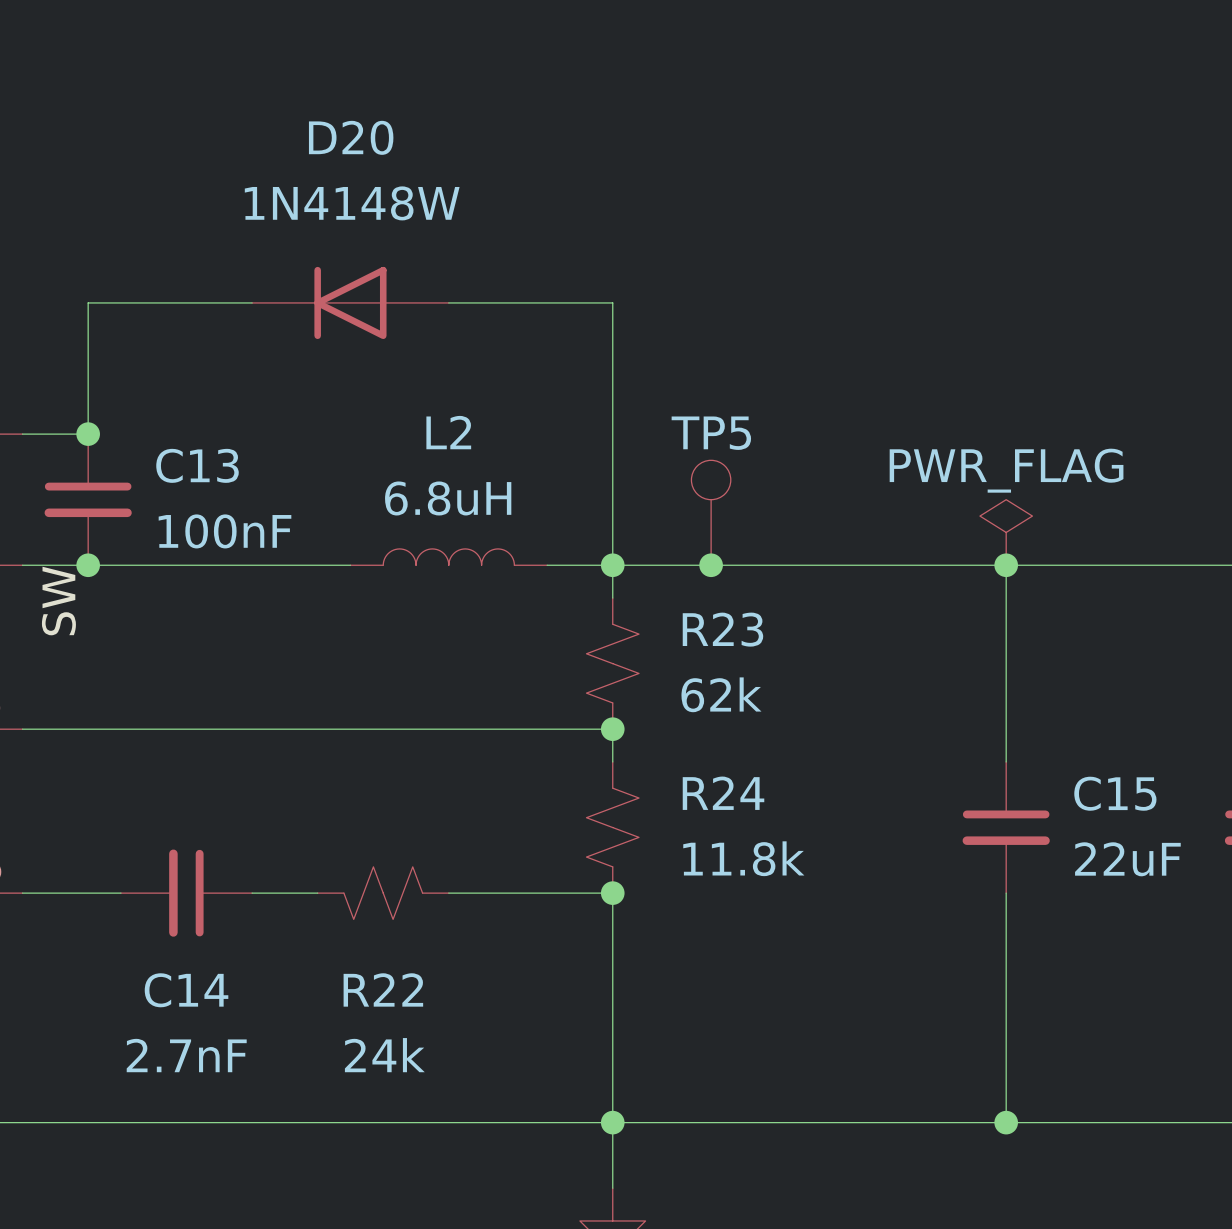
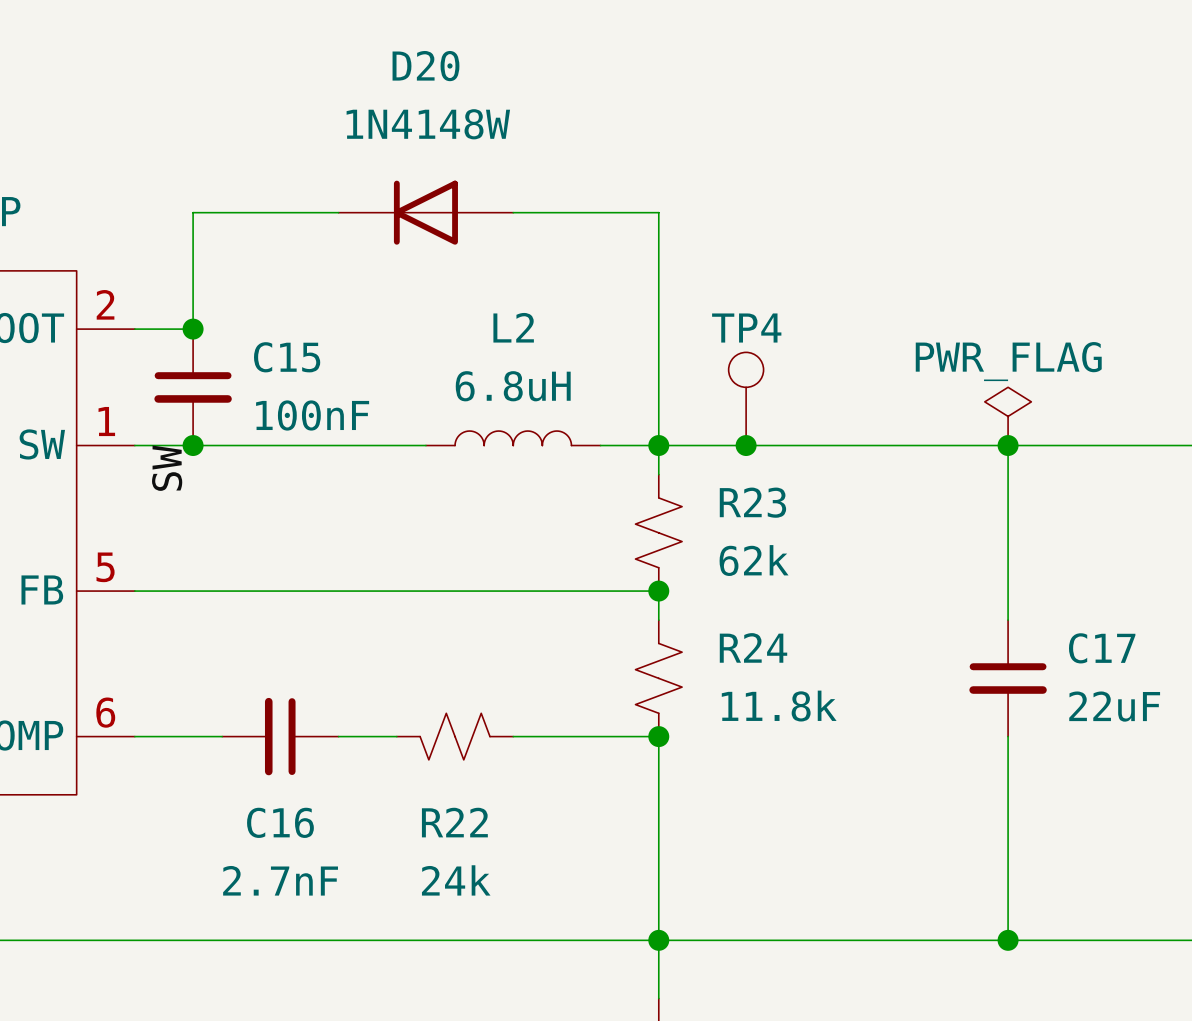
TP5 name: TP5 (711, 433) -> TP4 (746, 328)
C13 name: C13 (197, 465) -> C15 (287, 357)
C15 name: C15 (1115, 793) -> C17 (1102, 648)
C14 name: C14 (186, 990) -> C16 (280, 822)

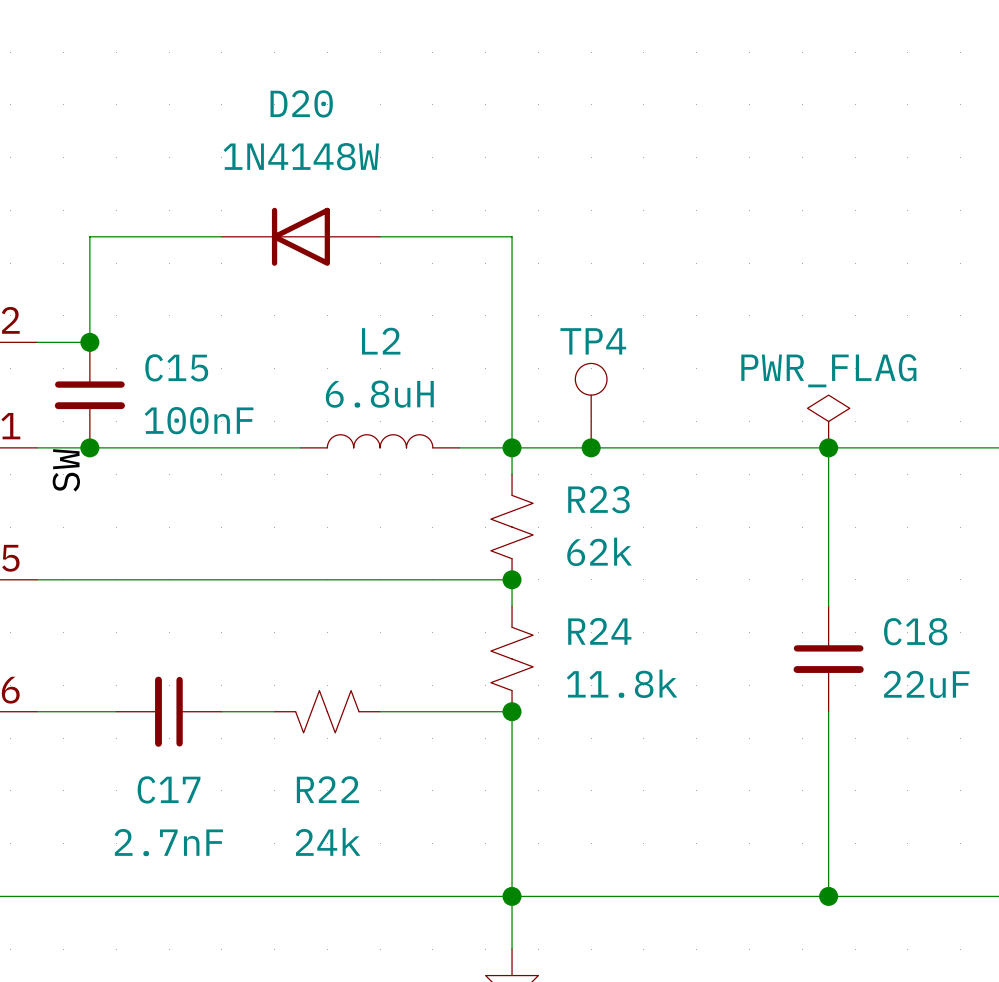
C17 name: C17 (1102, 648) -> C18 (915, 631)
C16 name: C16 (280, 822) -> C17 (169, 789)

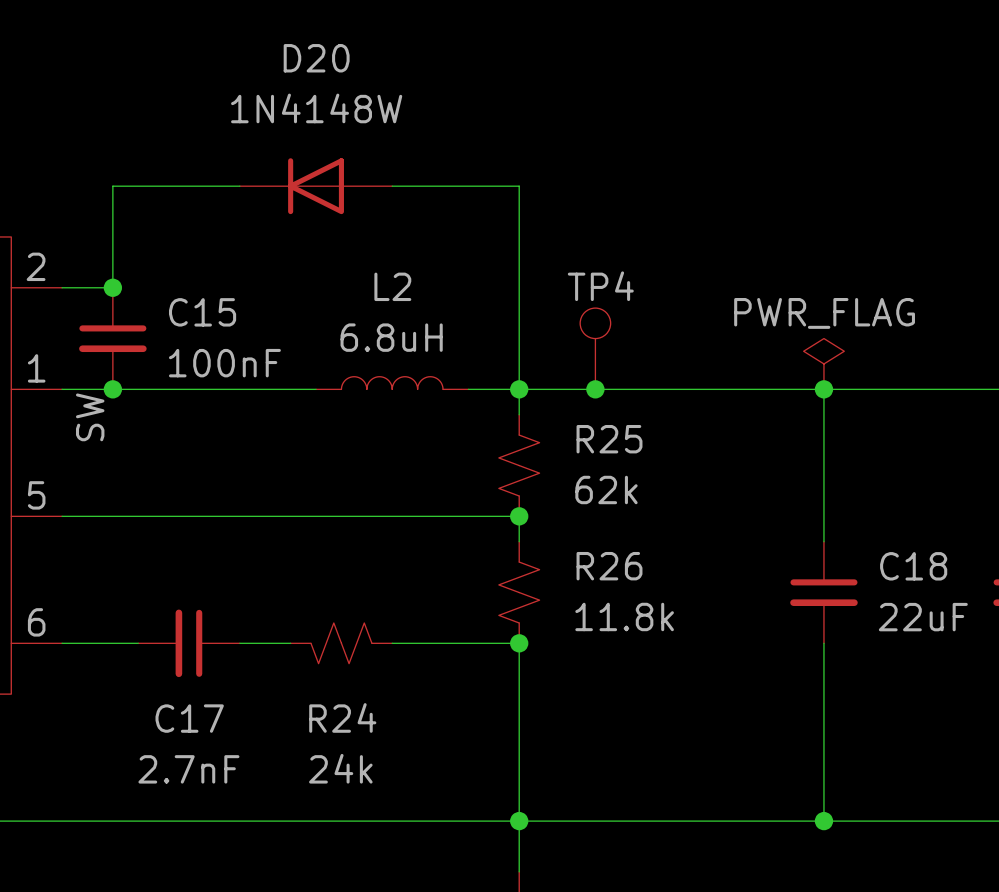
R23 name: R23 (598, 499) -> R25 (609, 439)
R24 name: R24 (599, 631) -> R26 (609, 566)
R22 name: R22 (327, 789) -> R24 (342, 717)

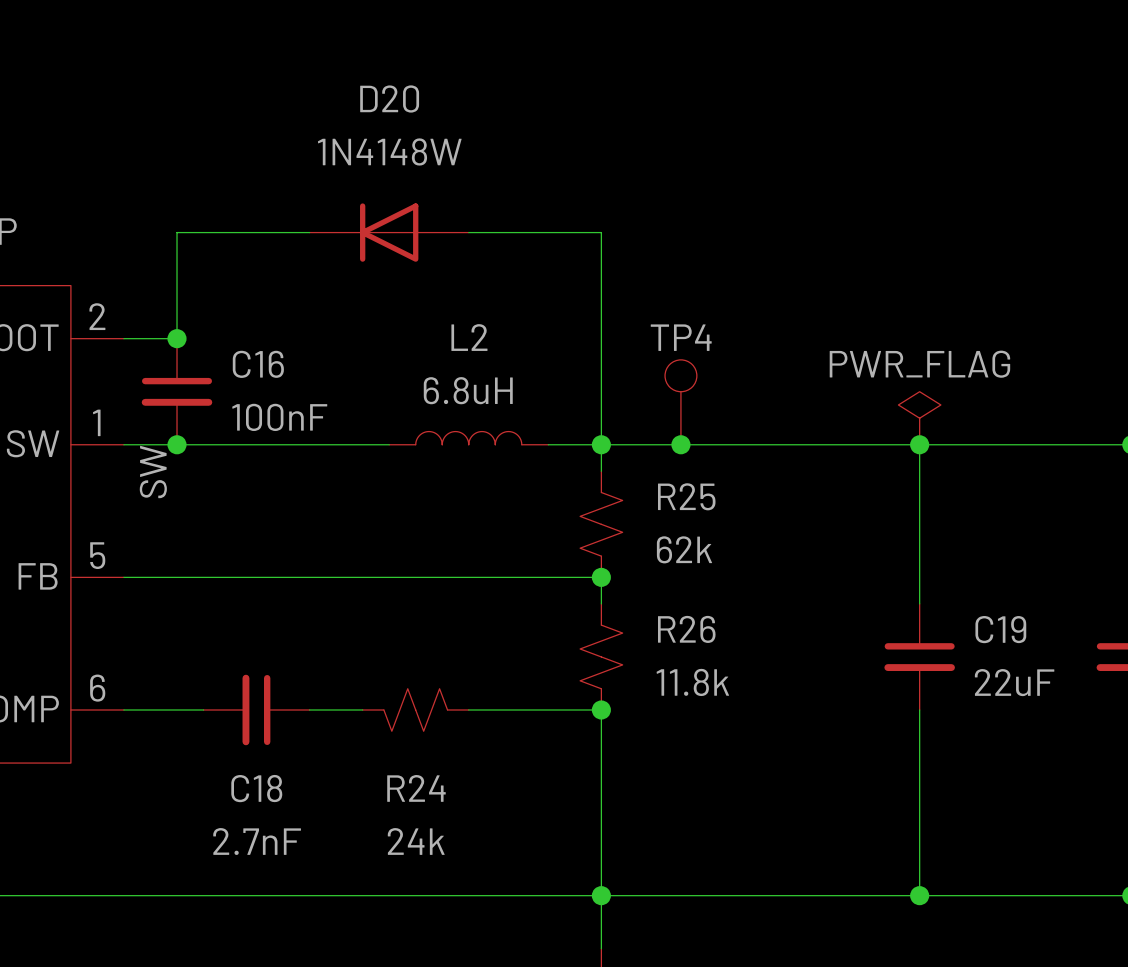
C15 name: C15 (202, 312) -> C16 (258, 364)
C18 name: C18 (913, 566) -> C19 (1000, 629)
C17 name: C17 (189, 718) -> C18 (256, 788)

